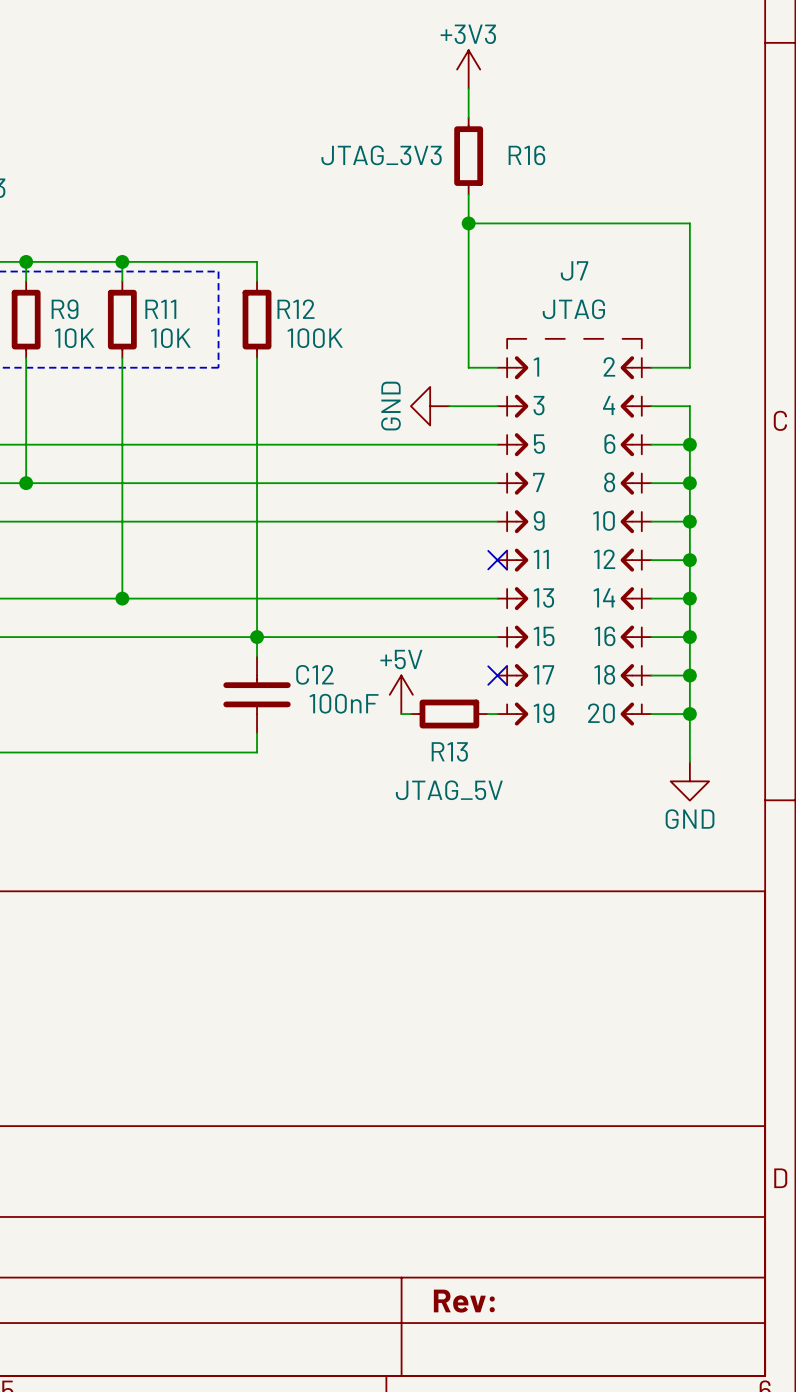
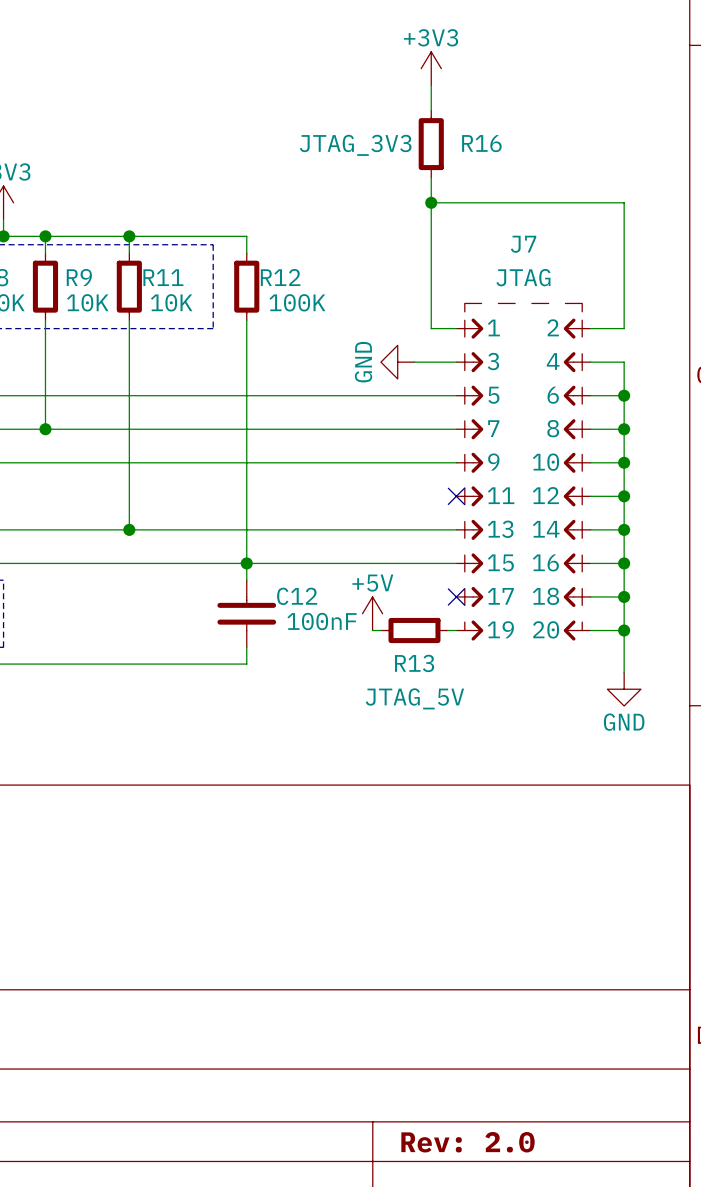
title block: Rev: (464, 1301) -> Rev: 2.0 (468, 1142)

